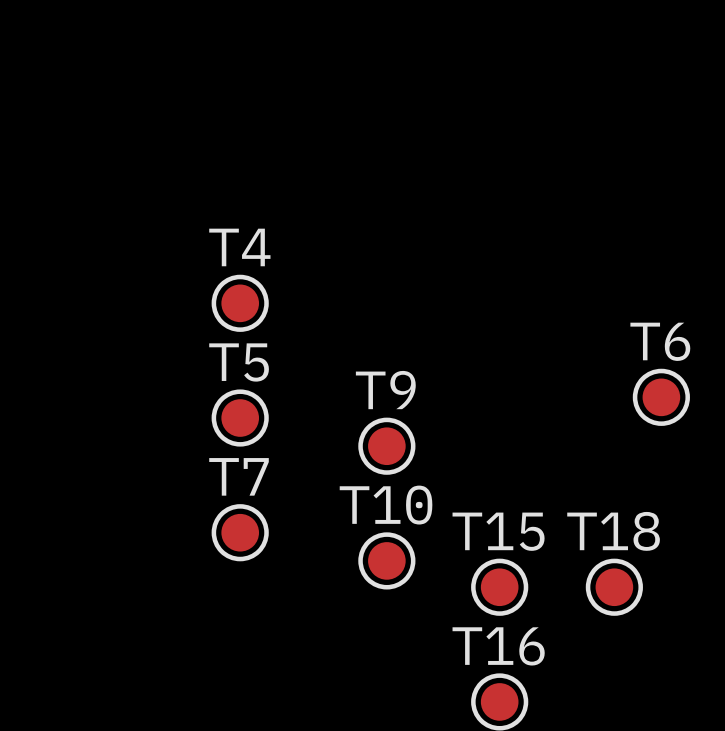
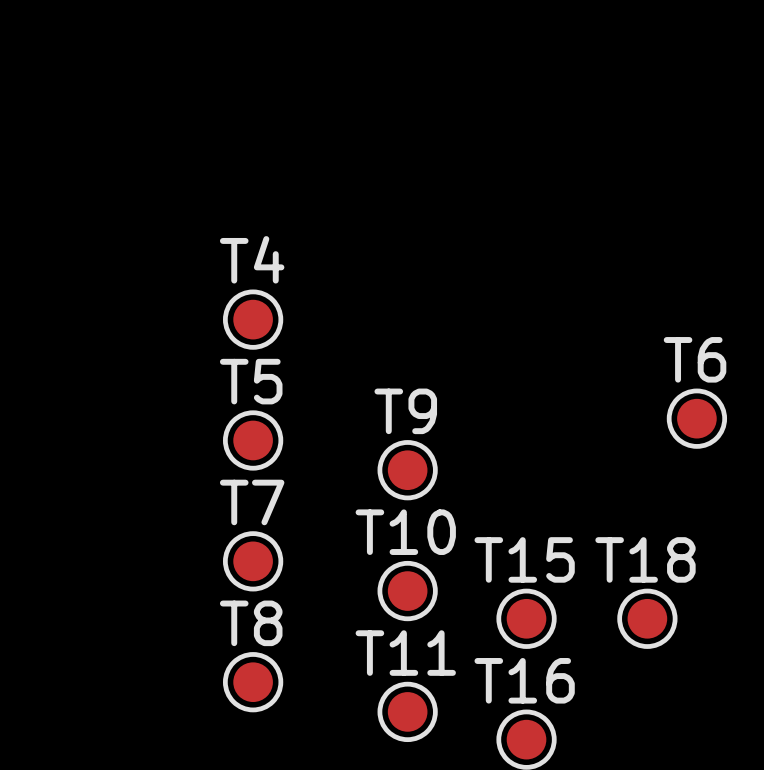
T8: none -> (253, 682)
T11: none -> (407, 711)

